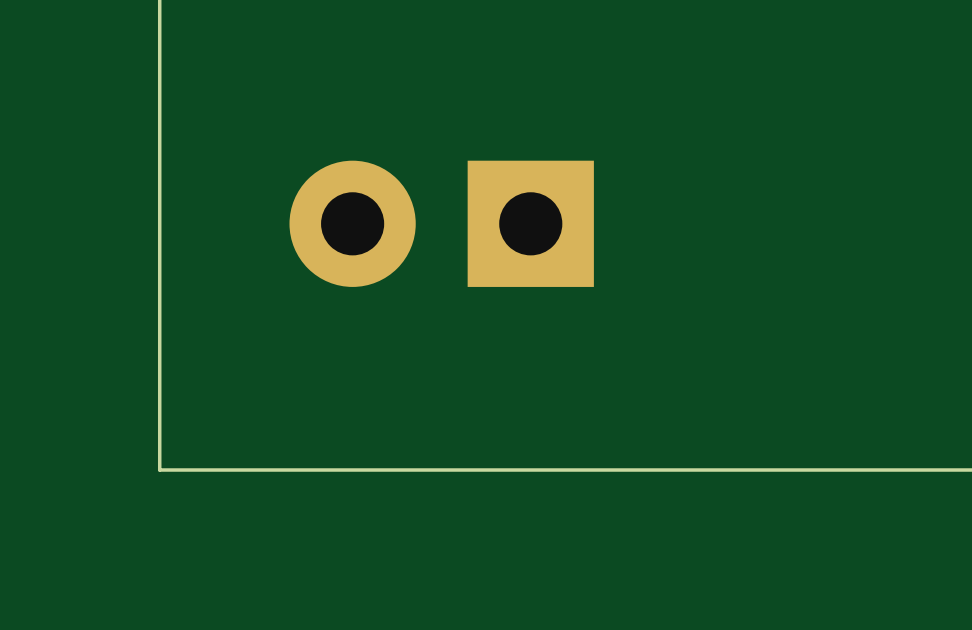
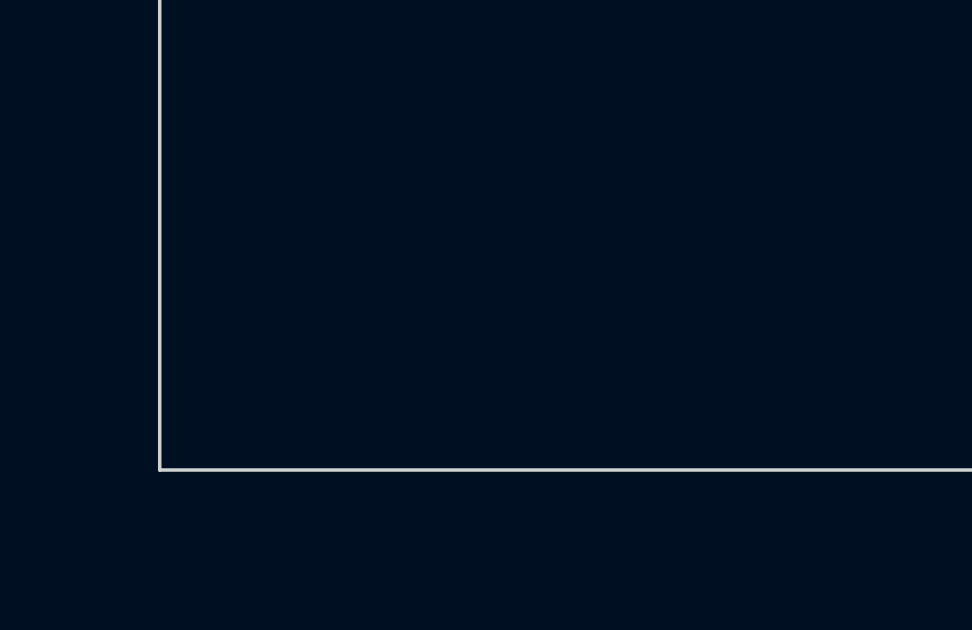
part: (441, 223) -> none

